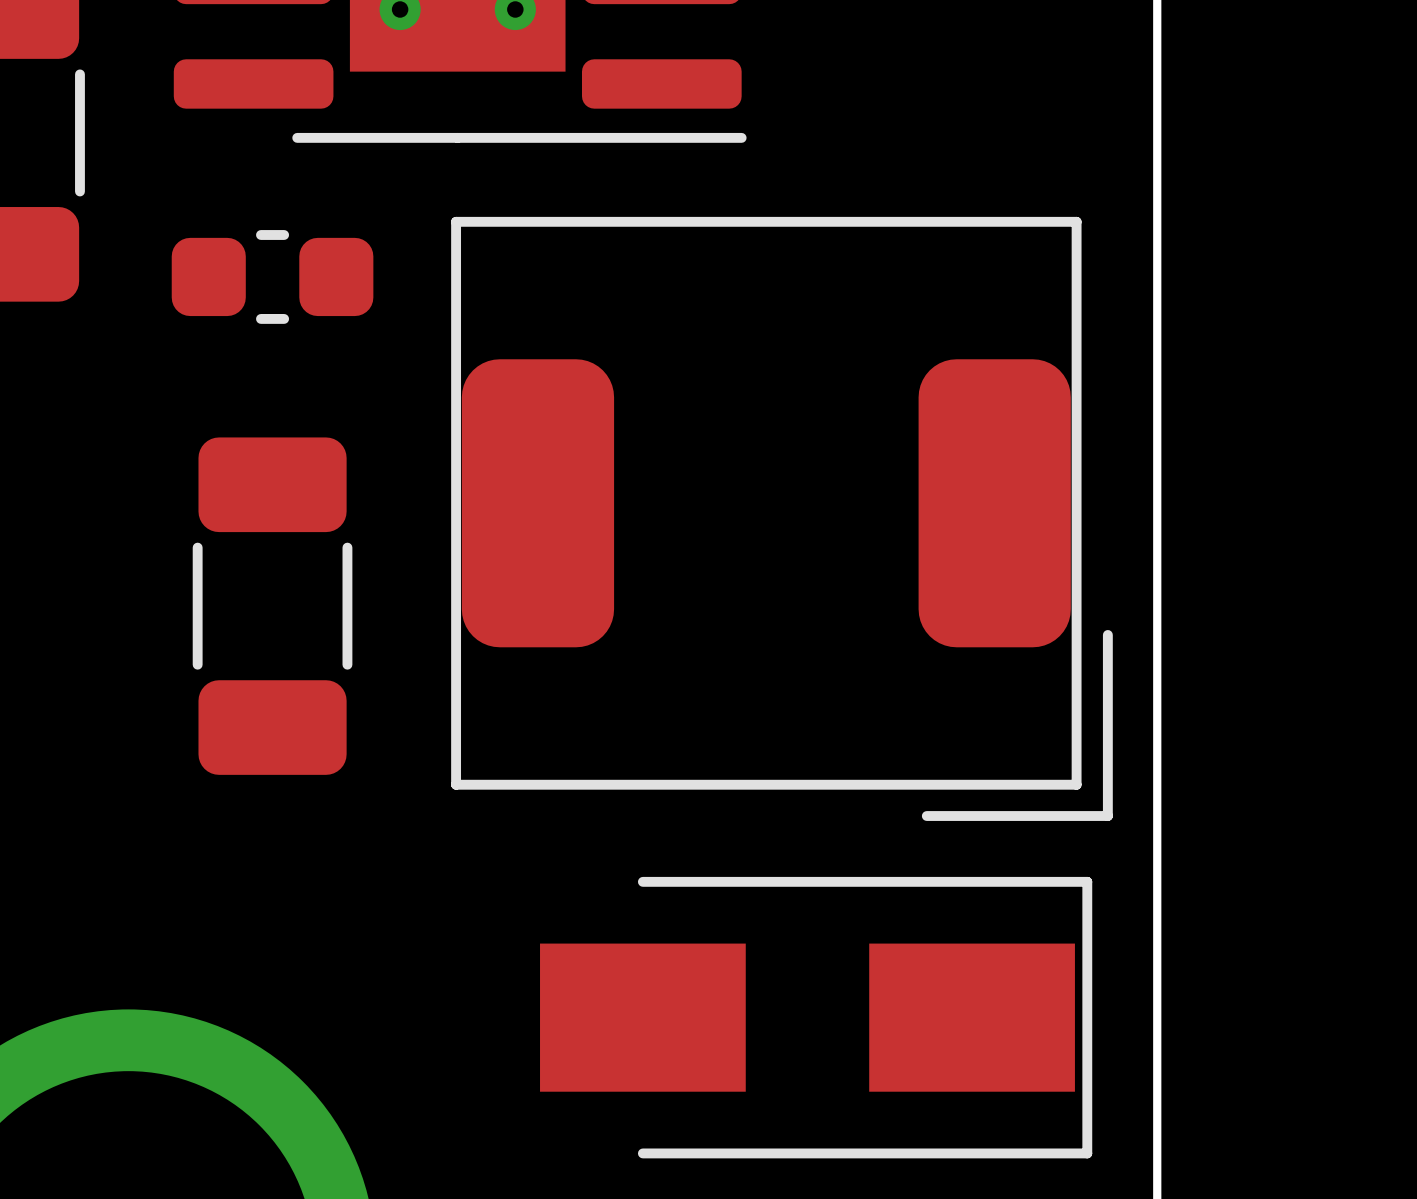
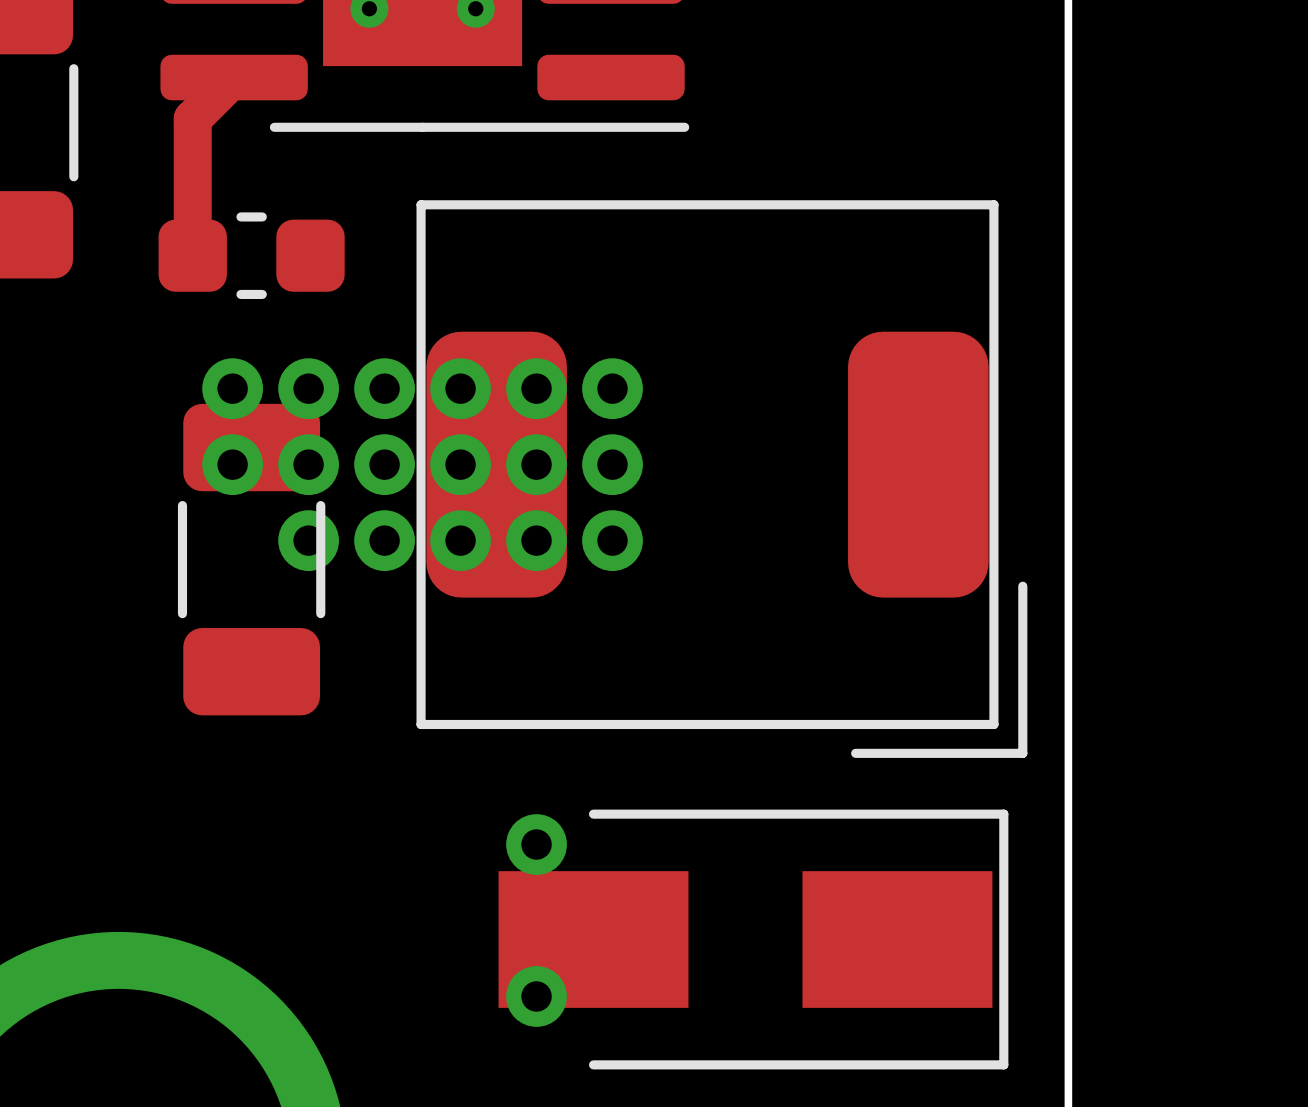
track: none -> (234, 77) (192, 118) (192, 255)
via: none -> (232, 388)
via: none -> (308, 388)
via: none -> (384, 388)
via: none -> (460, 388)
via: none -> (536, 388)
via: none -> (612, 388)
via: none -> (232, 464)
via: none -> (308, 464)
via: none -> (384, 464)
via: none -> (460, 464)
via: none -> (536, 464)
via: none -> (612, 464)
via: none -> (308, 540)
via: none -> (384, 540)
via: none -> (460, 540)
via: none -> (536, 540)
via: none -> (612, 540)
via: none -> (536, 844)
via: none -> (536, 996)

